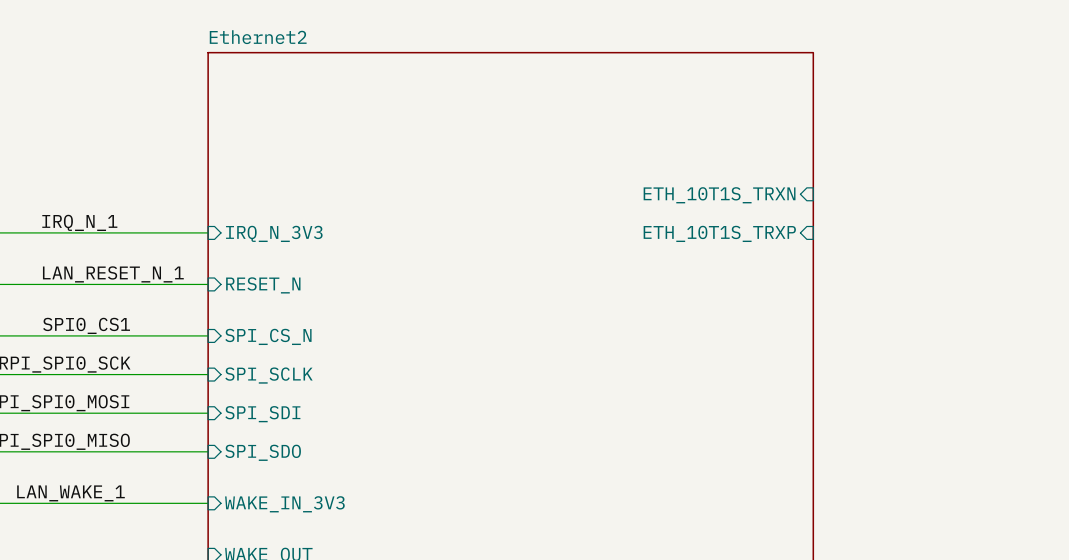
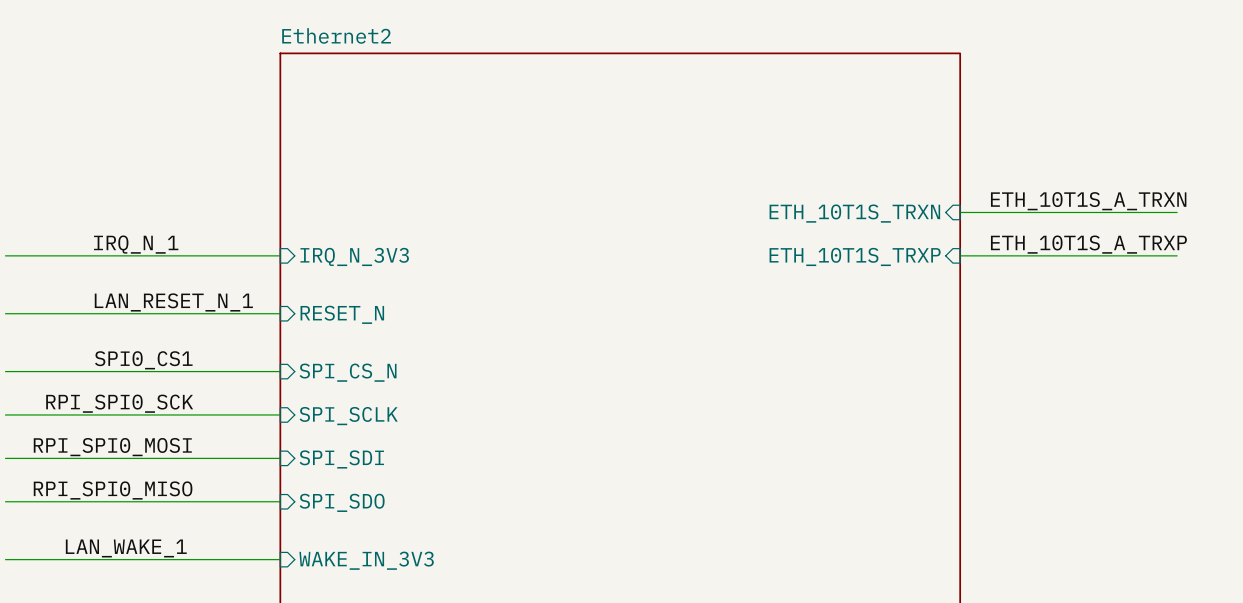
label: none -> ETH_10T1S_A_TRXN (1088, 201)
wire: none -> (960, 212) (1177, 212)
label: none -> ETH_10T1S_A_TRXP (1088, 244)
wire: none -> (960, 255) (1177, 255)

